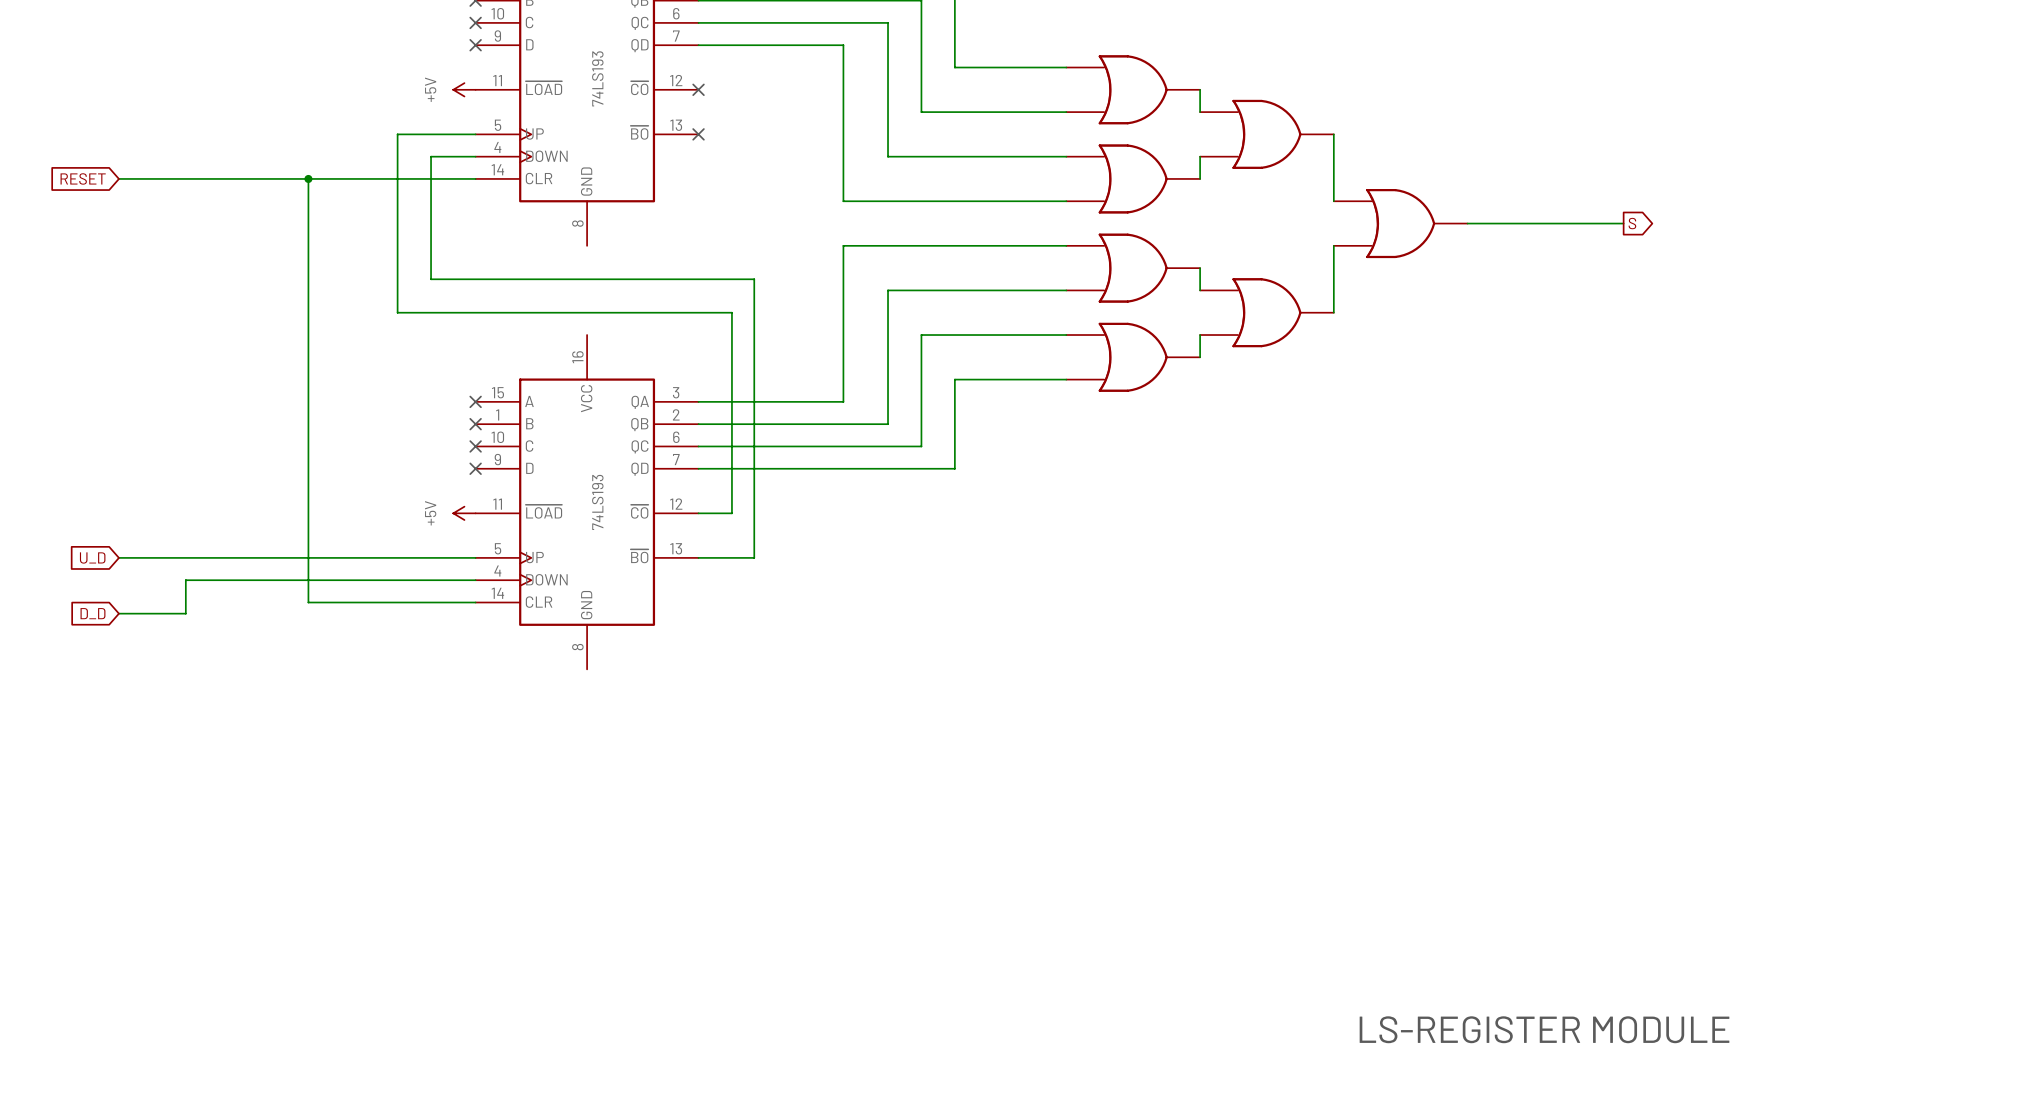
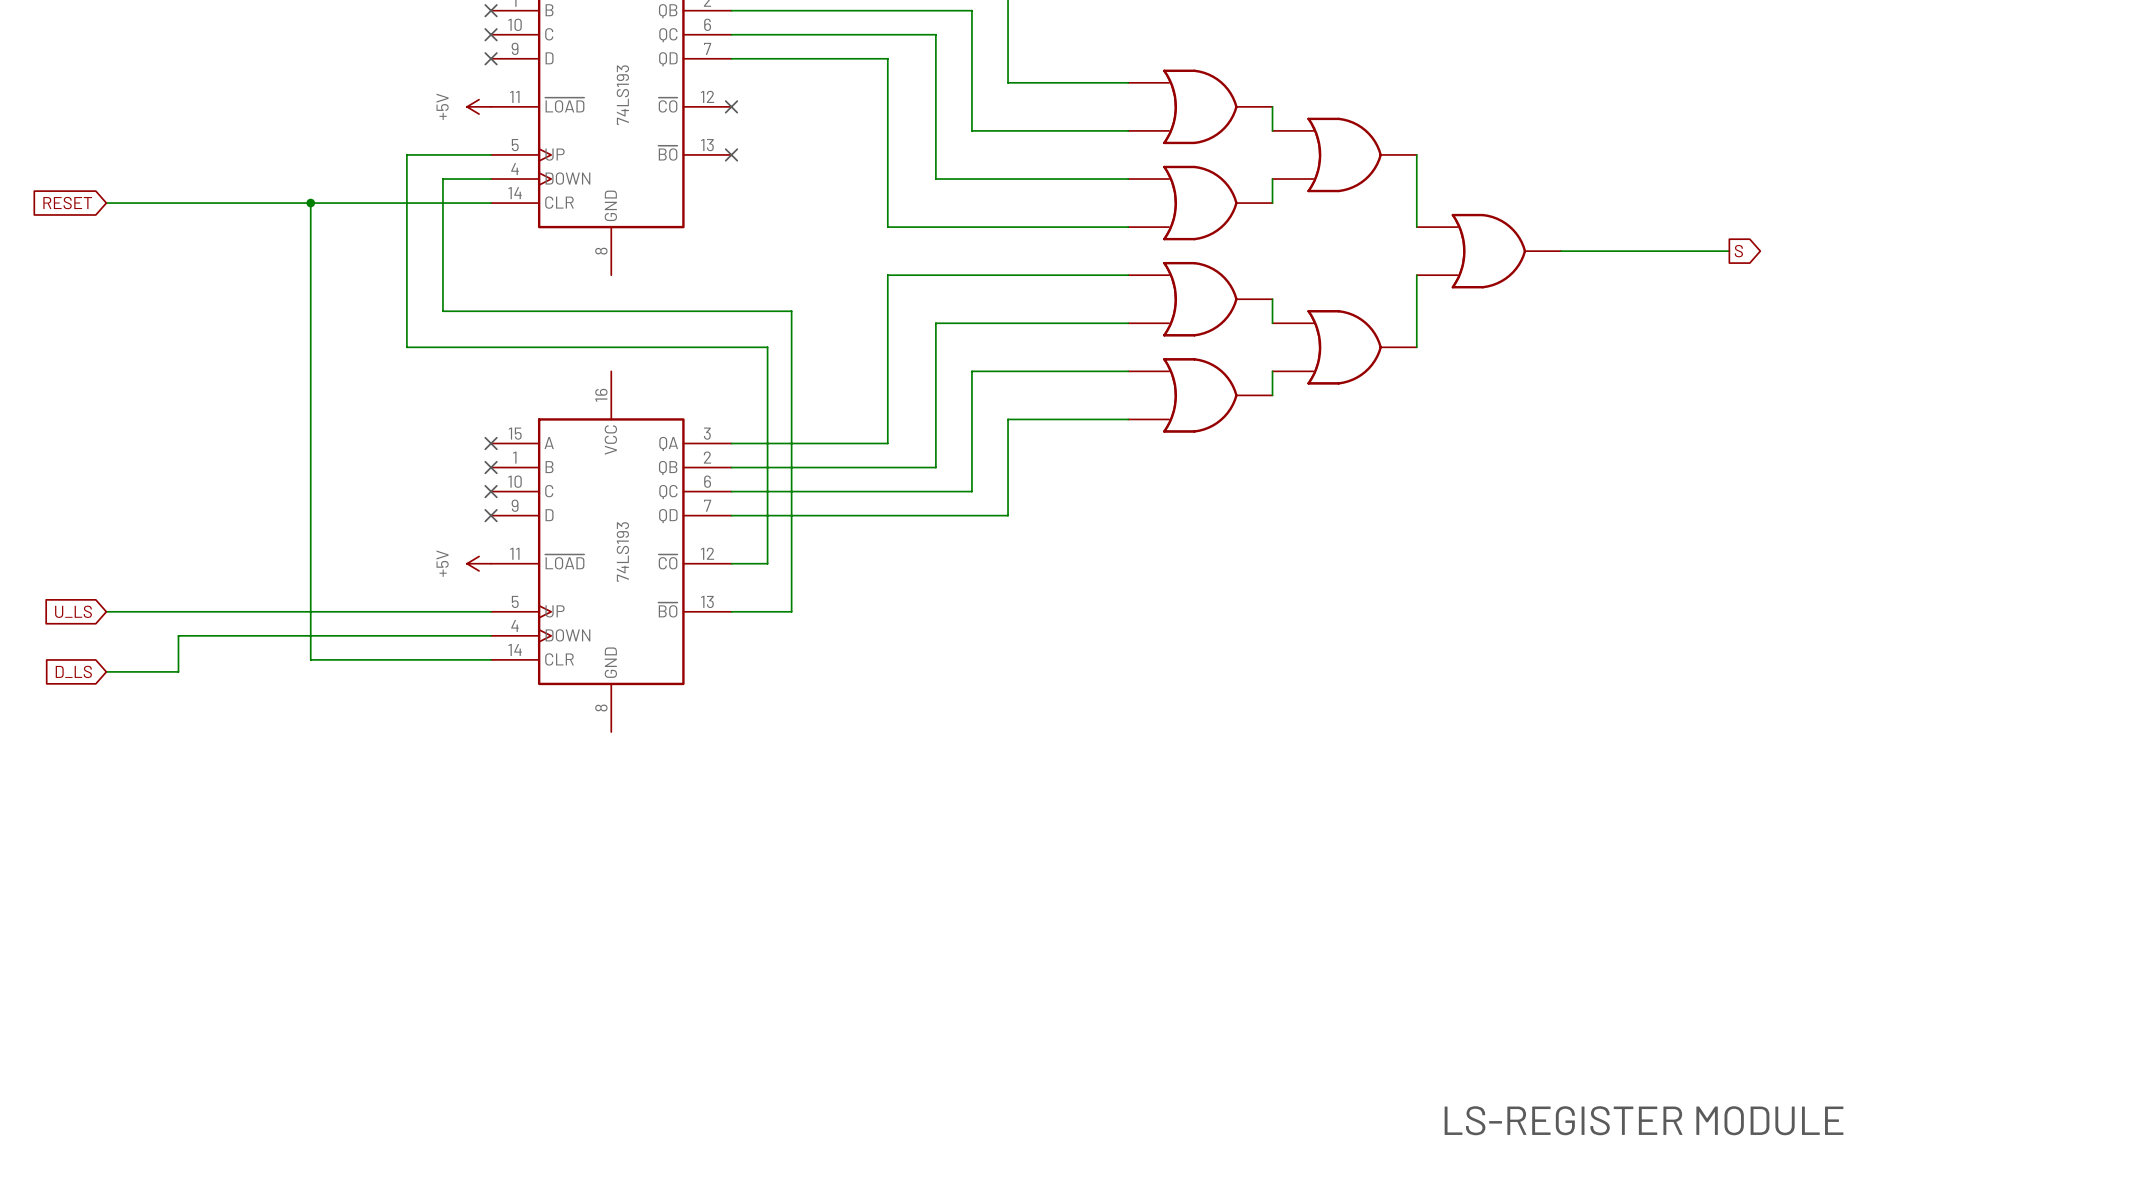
global label: U_D (92, 557) -> U_LS (73, 611)
global label: D_D (92, 613) -> D_LS (73, 671)

